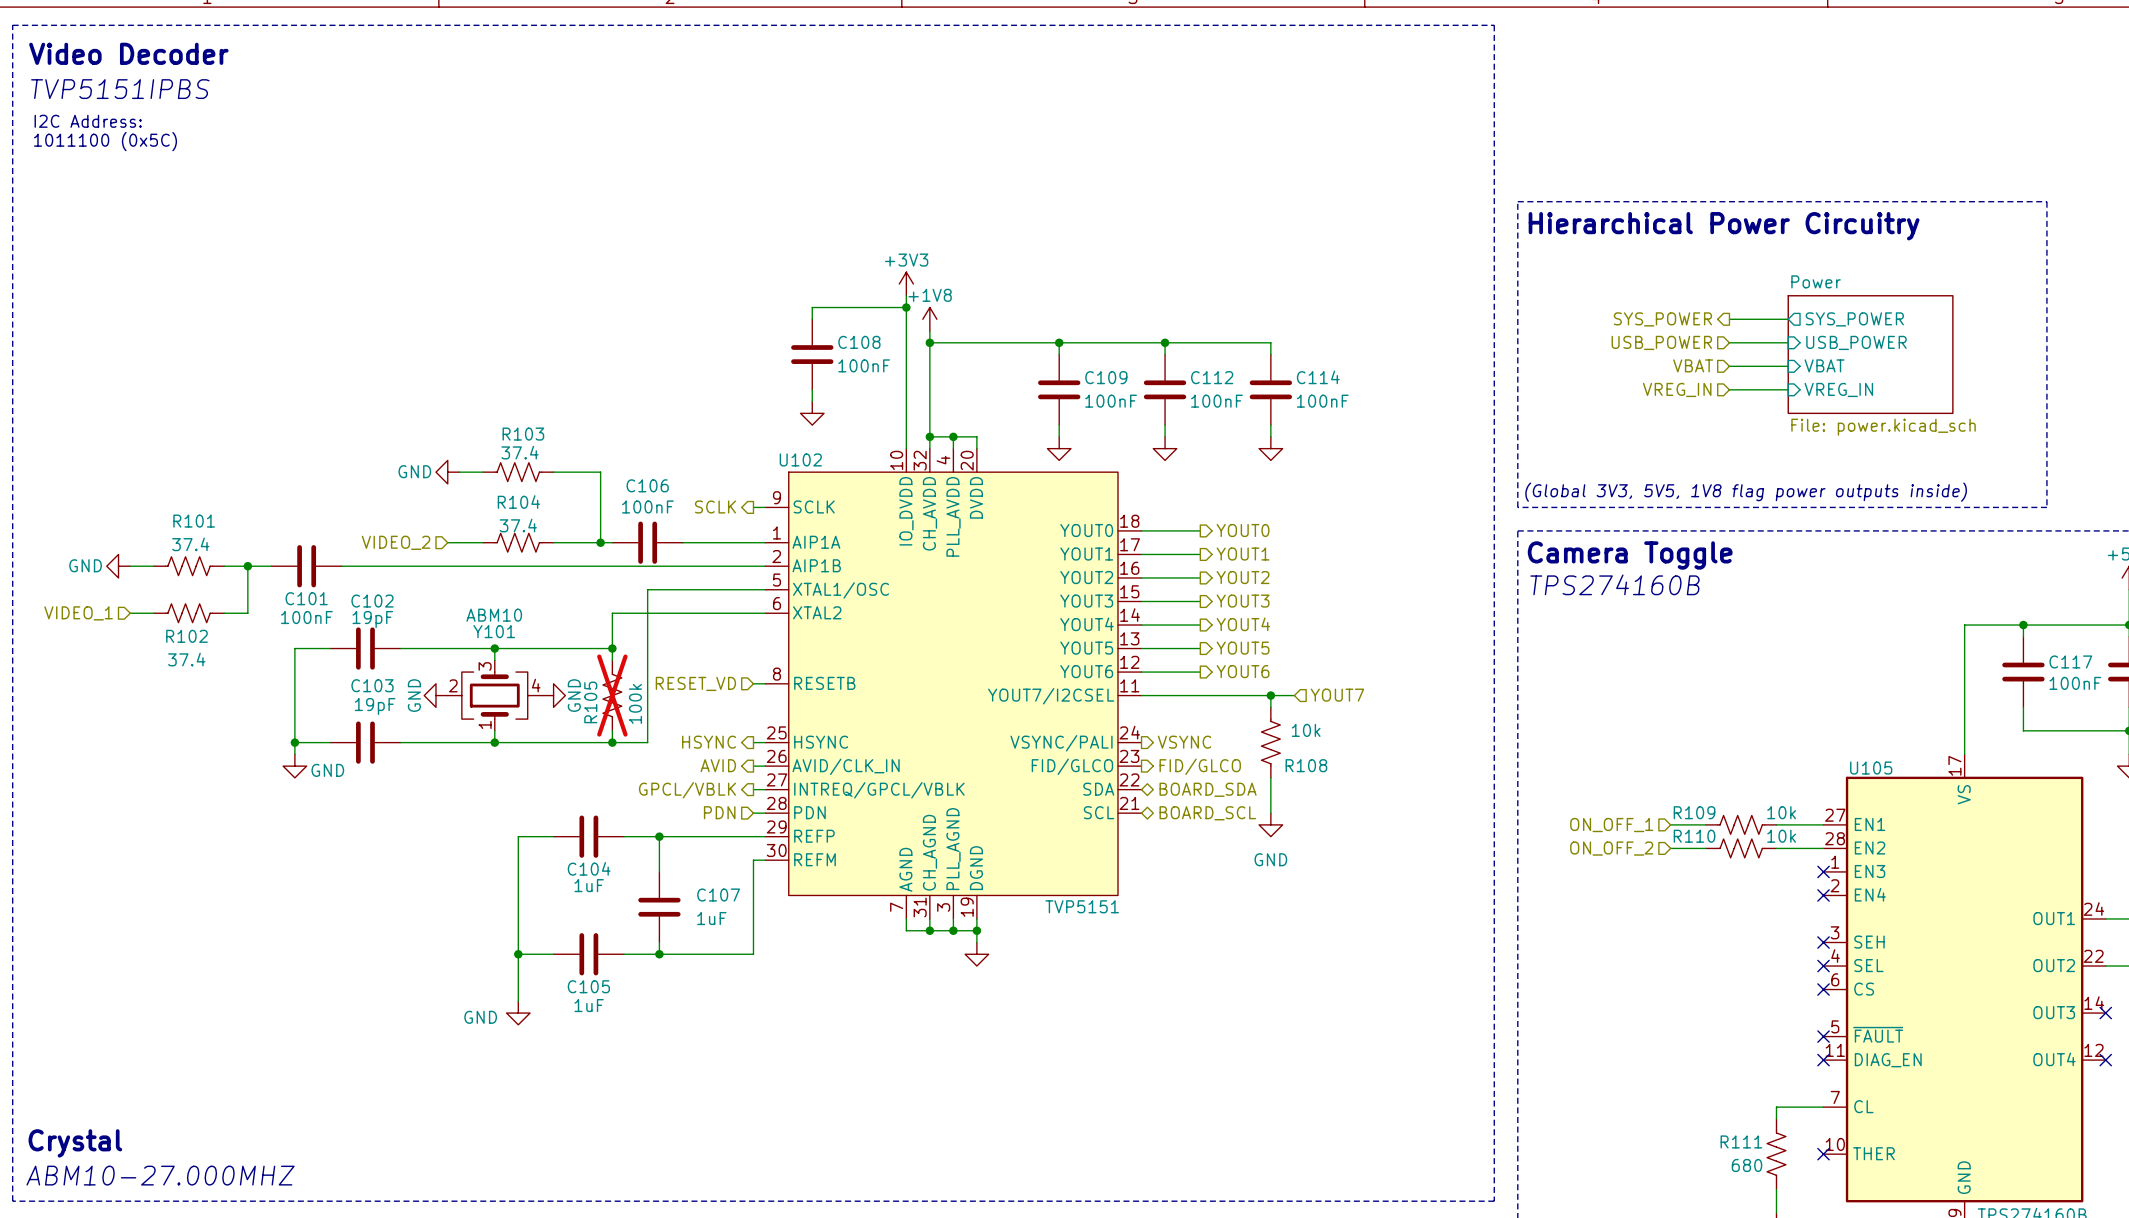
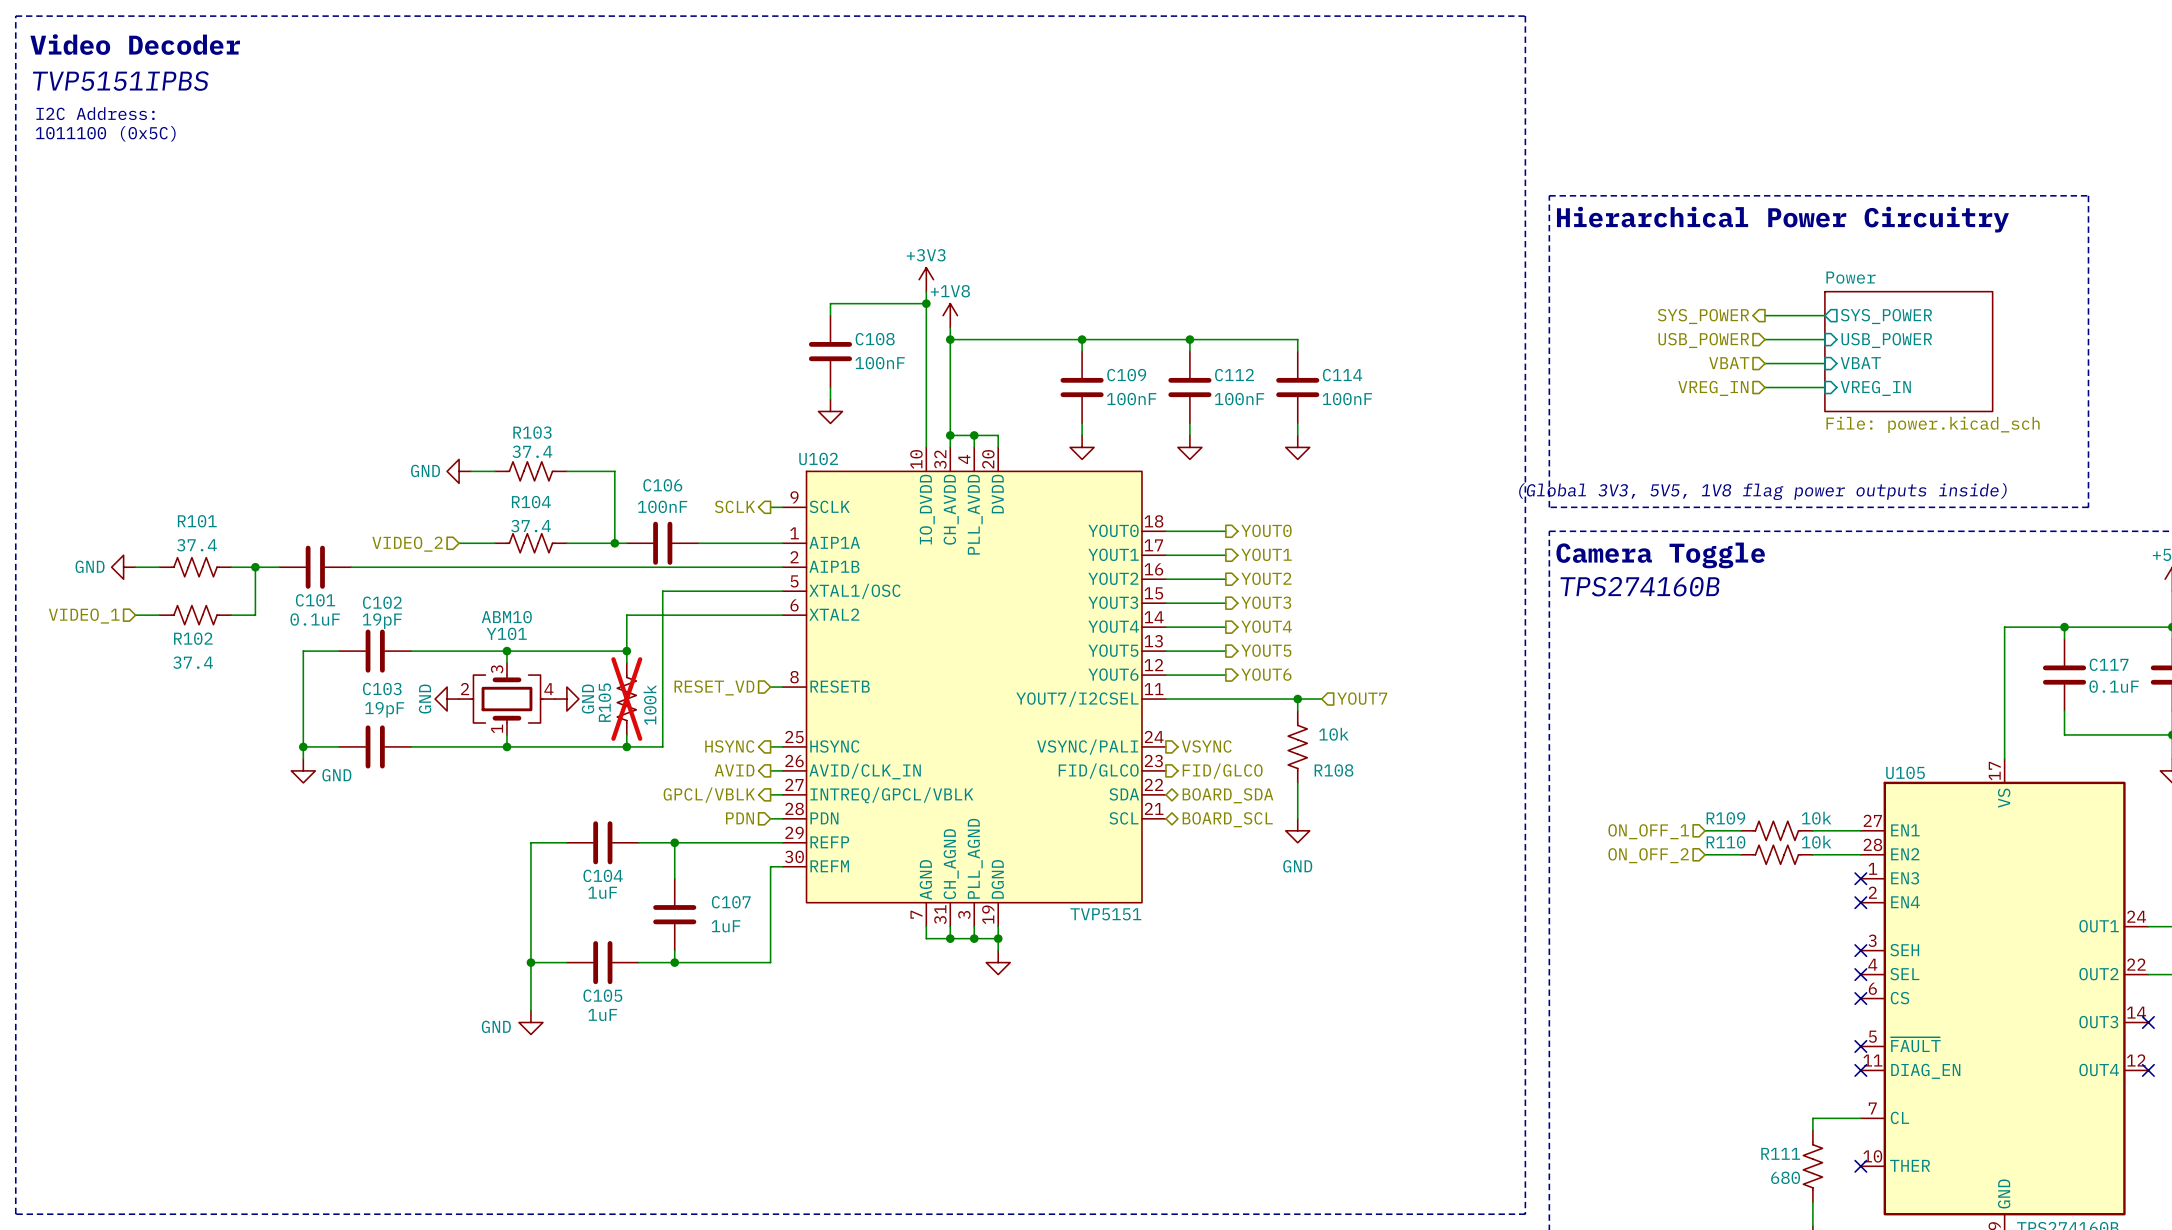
C101 value: 100nF (306, 617) -> 0.1uF (315, 619)
C117 value: 100nF (2075, 683) -> 0.1uF (2114, 686)
text: Crystal (75, 1143) -> none
text: ABM10-27.000MHZ (160, 1175) -> none

